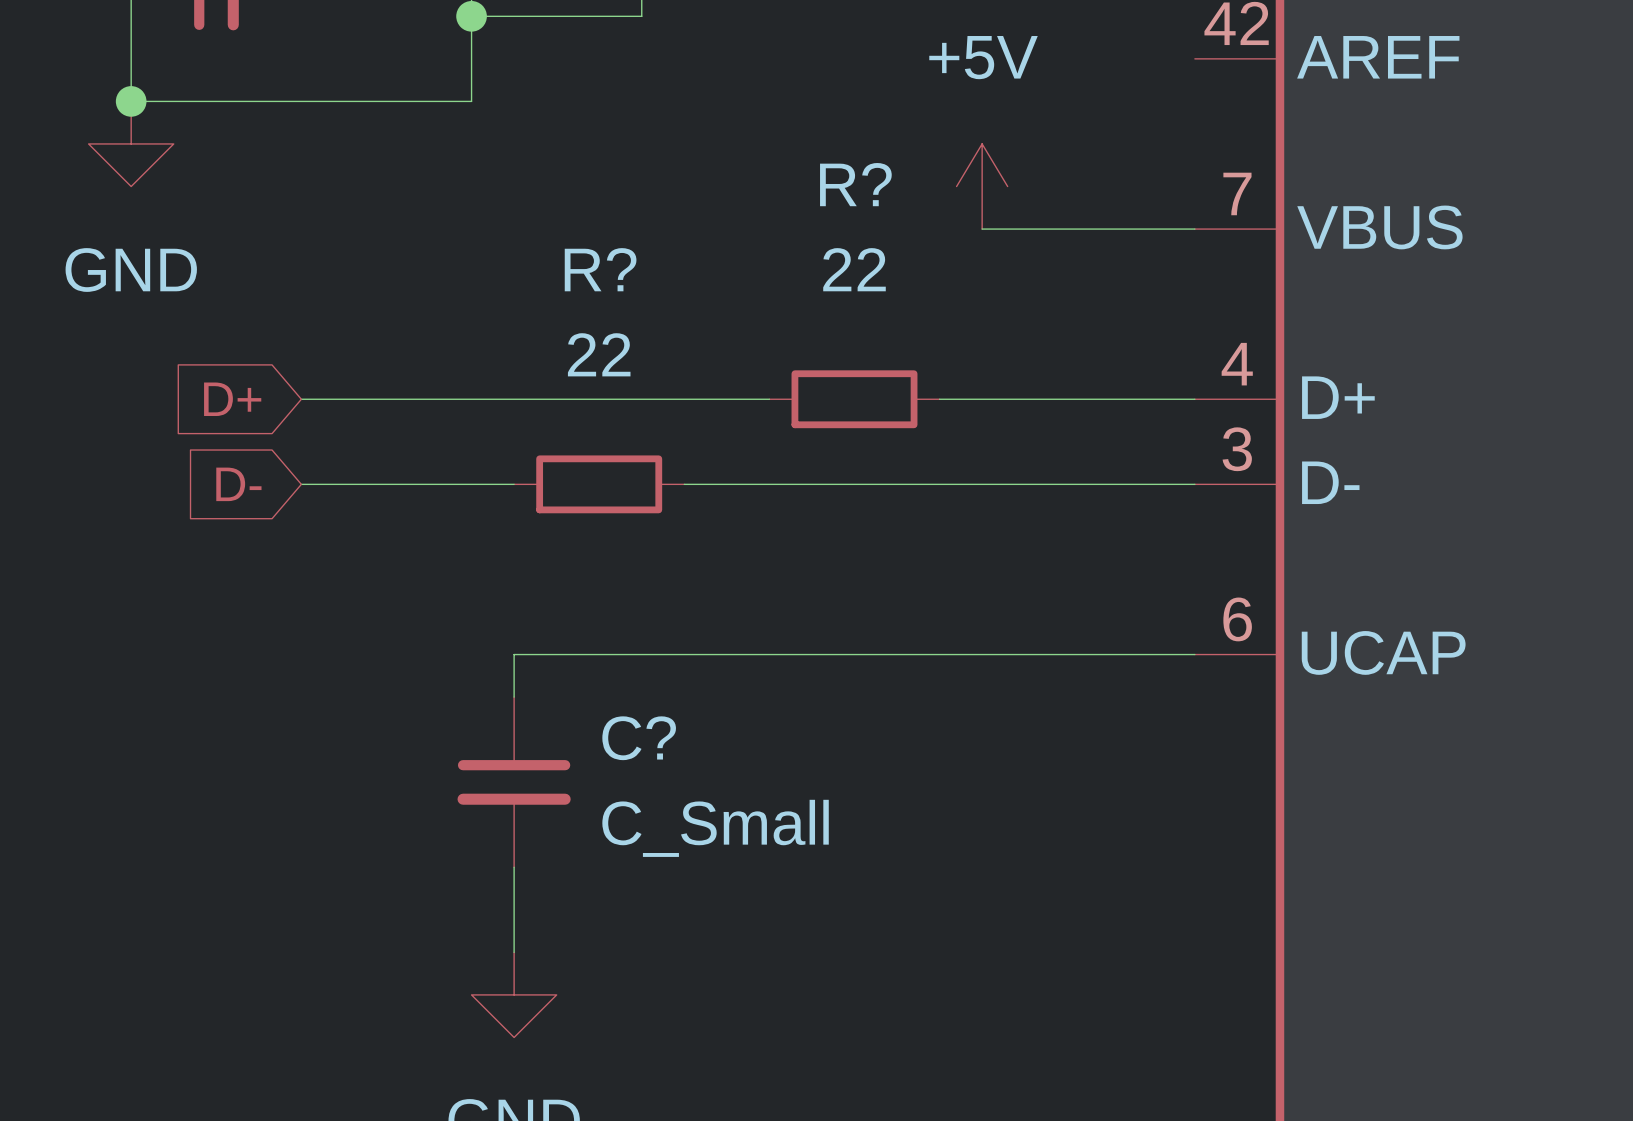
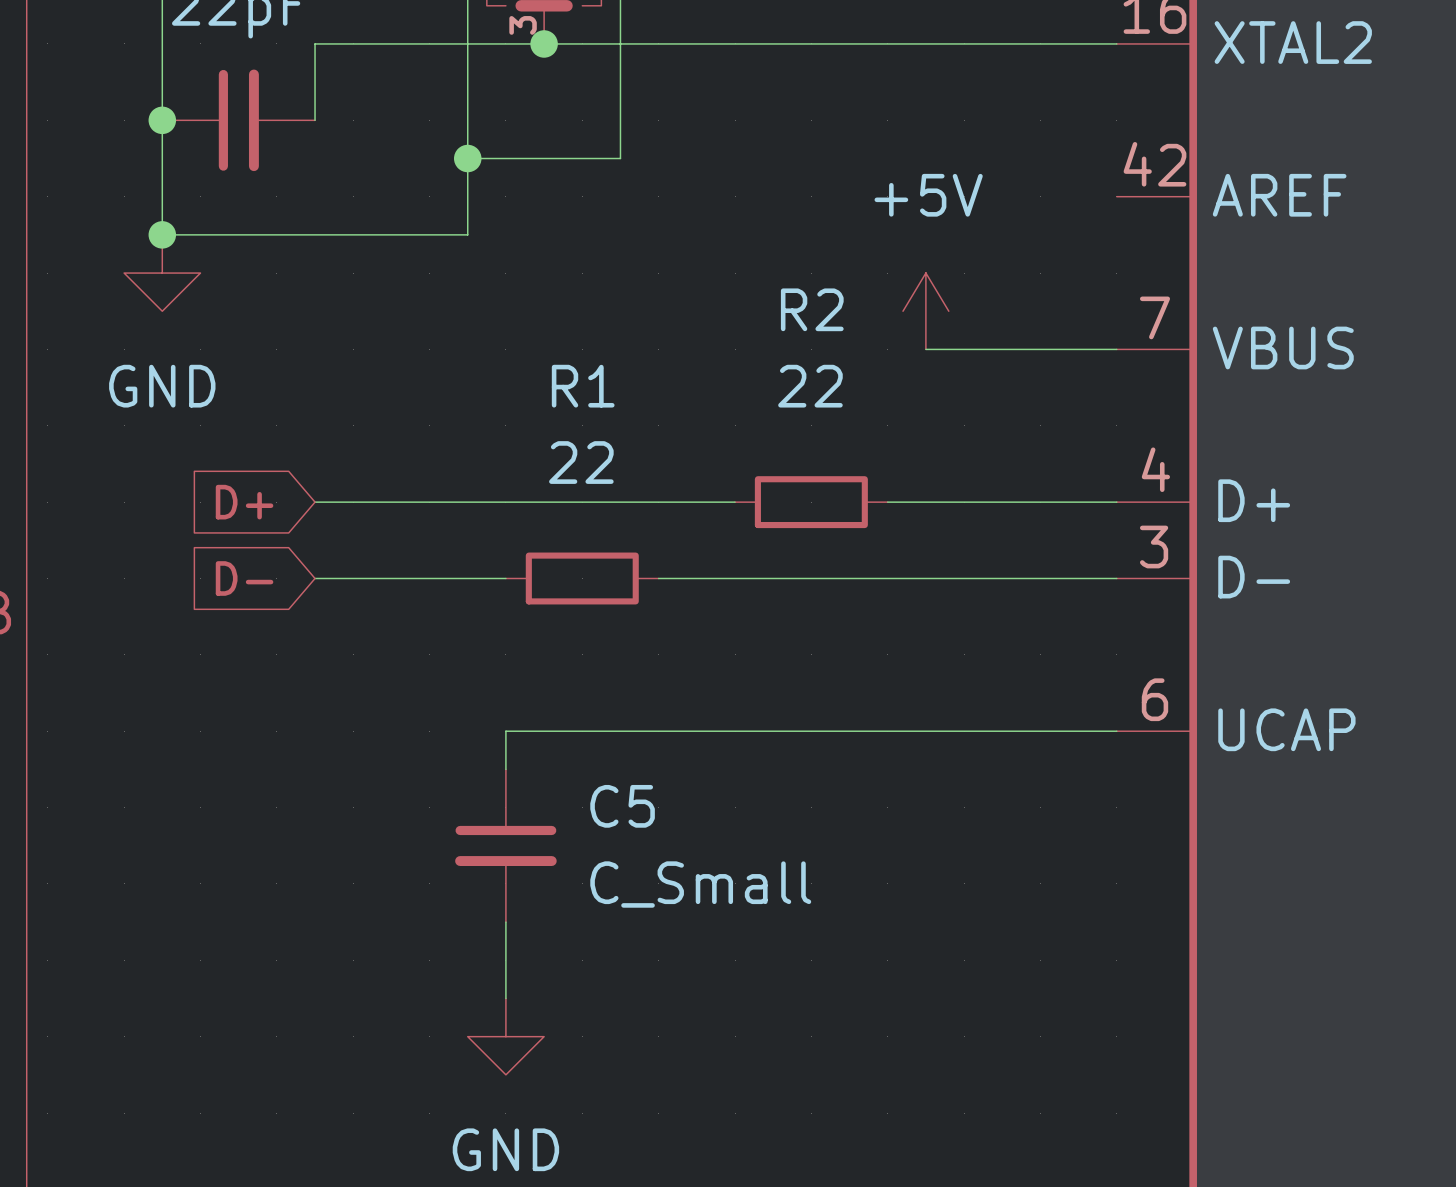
R? name: R? (855, 184) -> R2 (812, 309)
R? name: R? (600, 269) -> R1 (583, 386)
C? name: C? (639, 738) -> C5 (622, 806)

